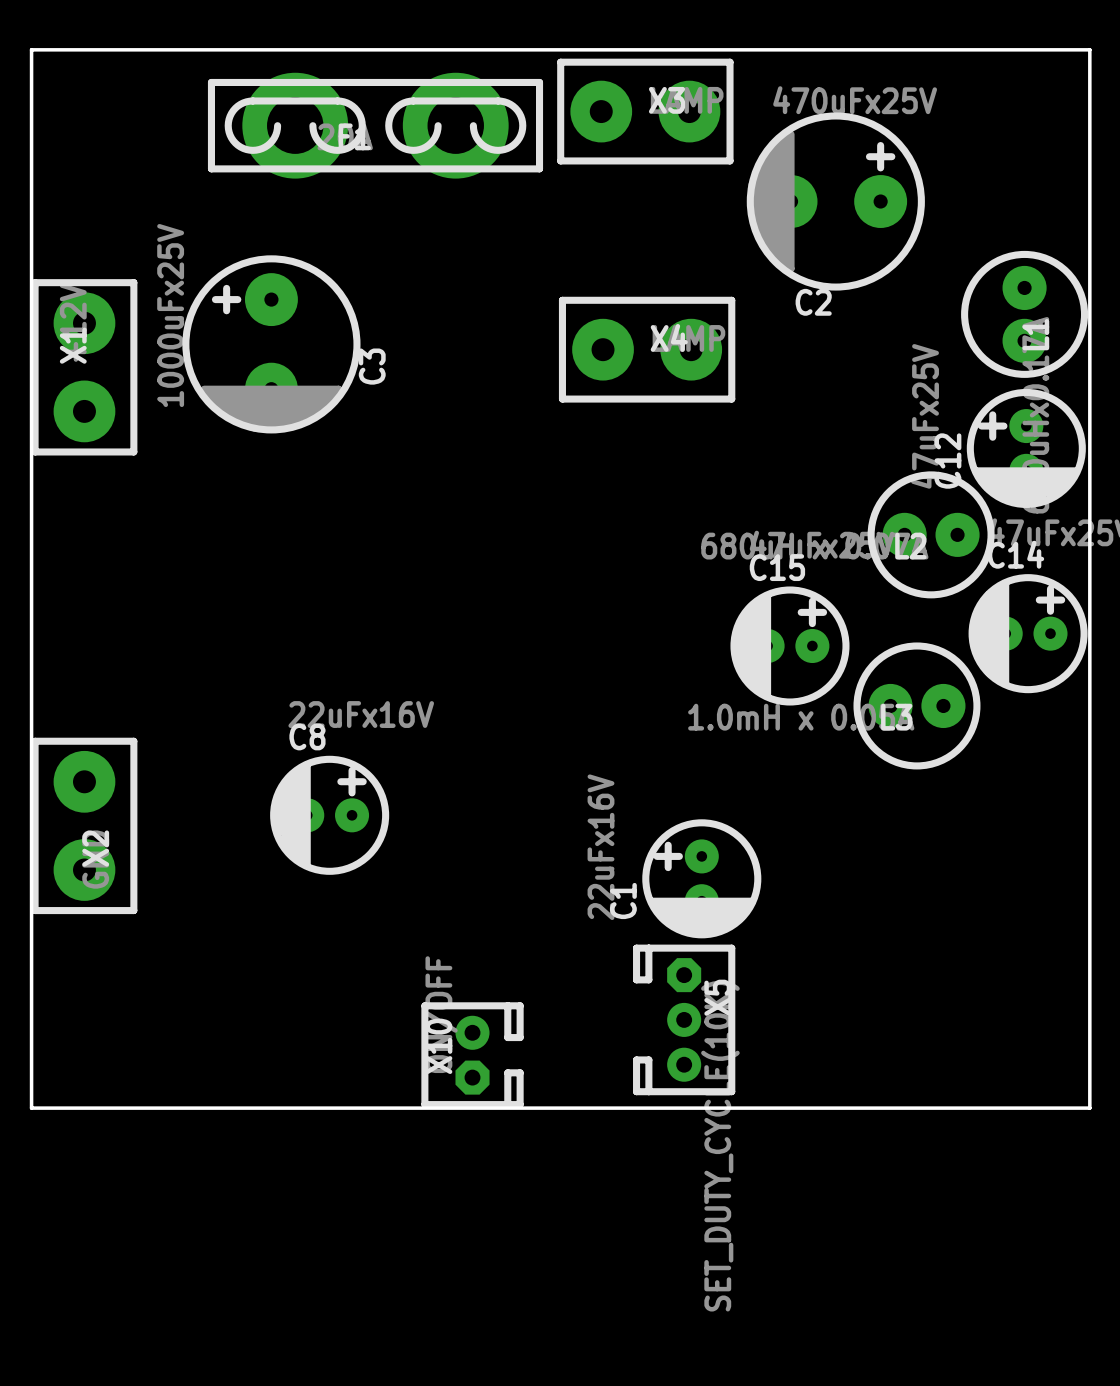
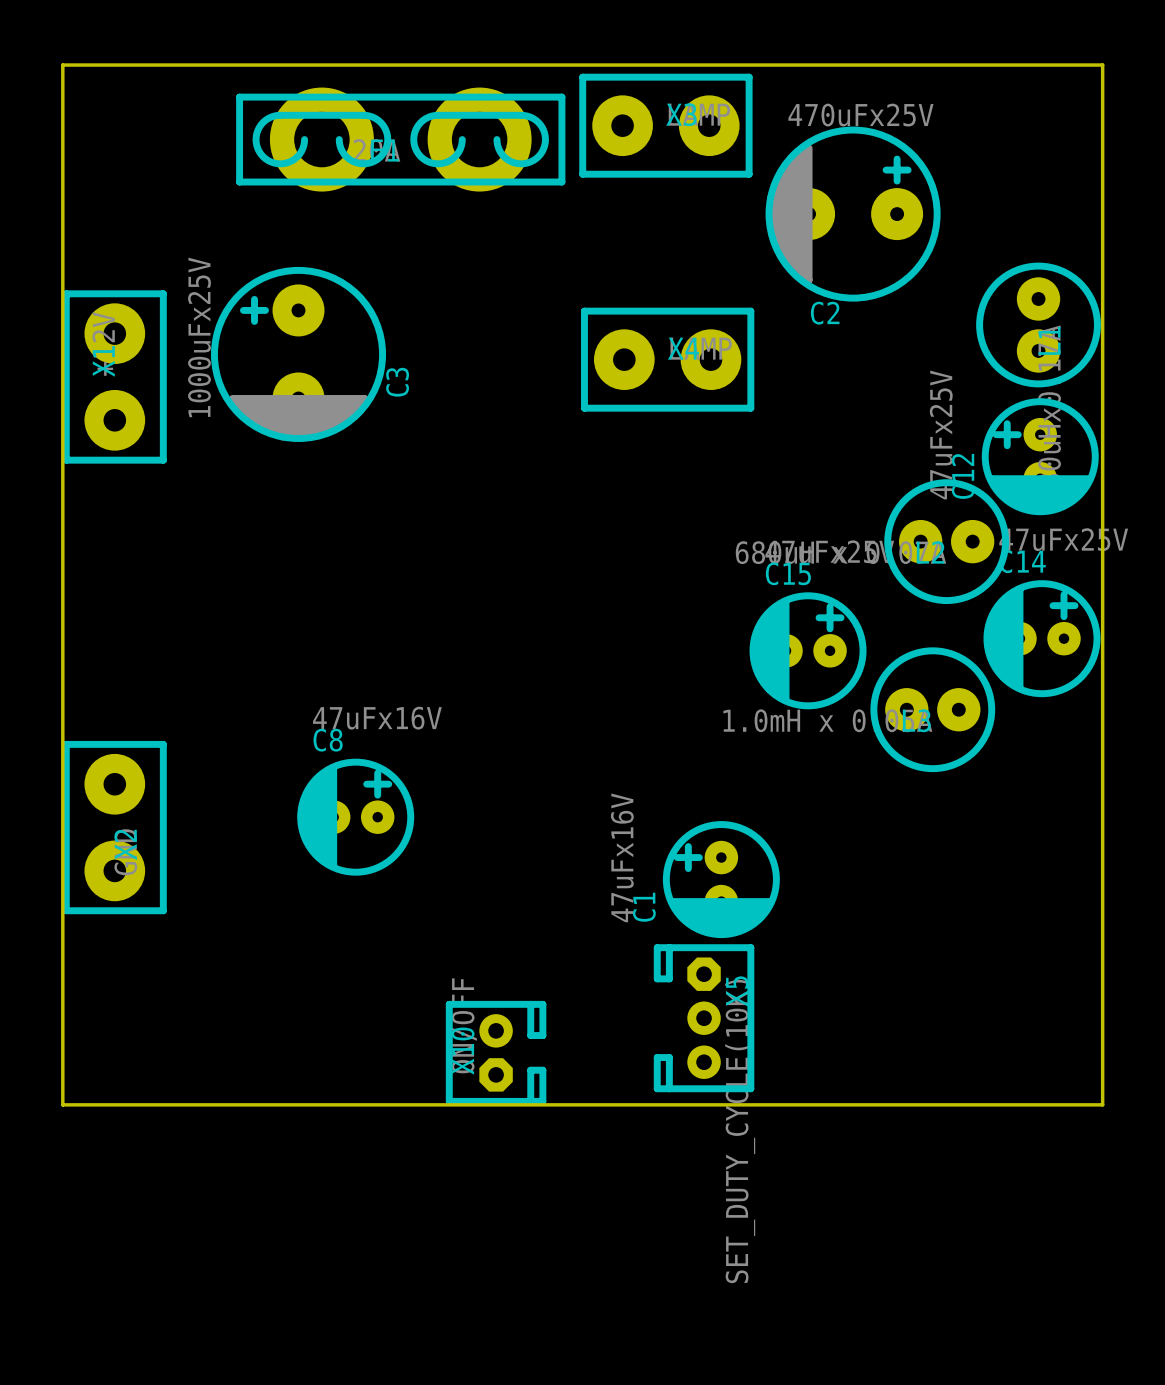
C8 value: 22uFx16V (361, 714) -> 47uFx16V (377, 718)
C1 value: 22uFx16V (601, 847) -> 47uFx16V (622, 857)

